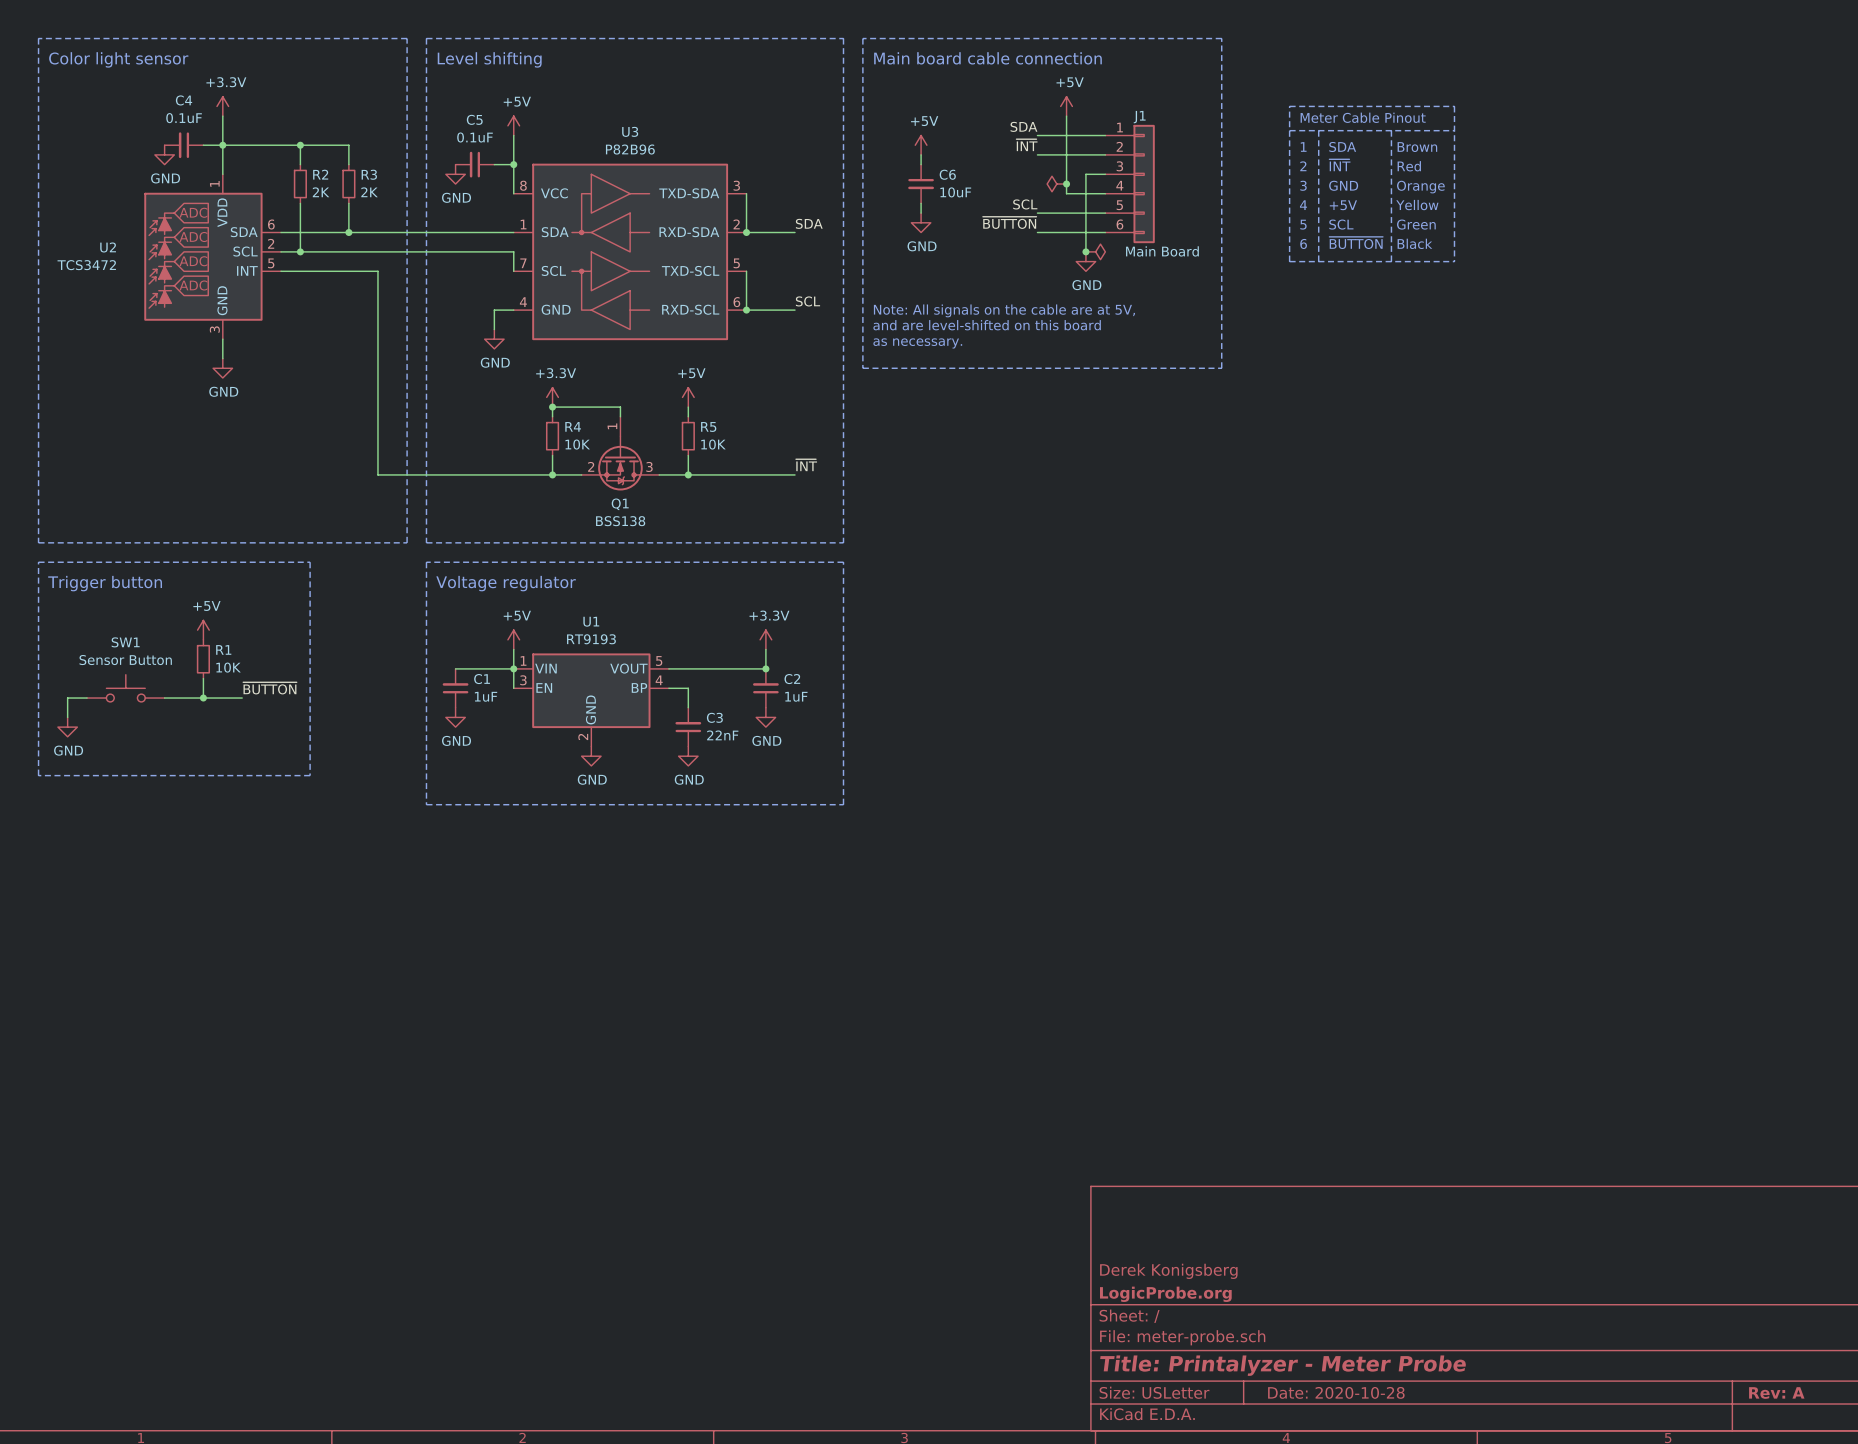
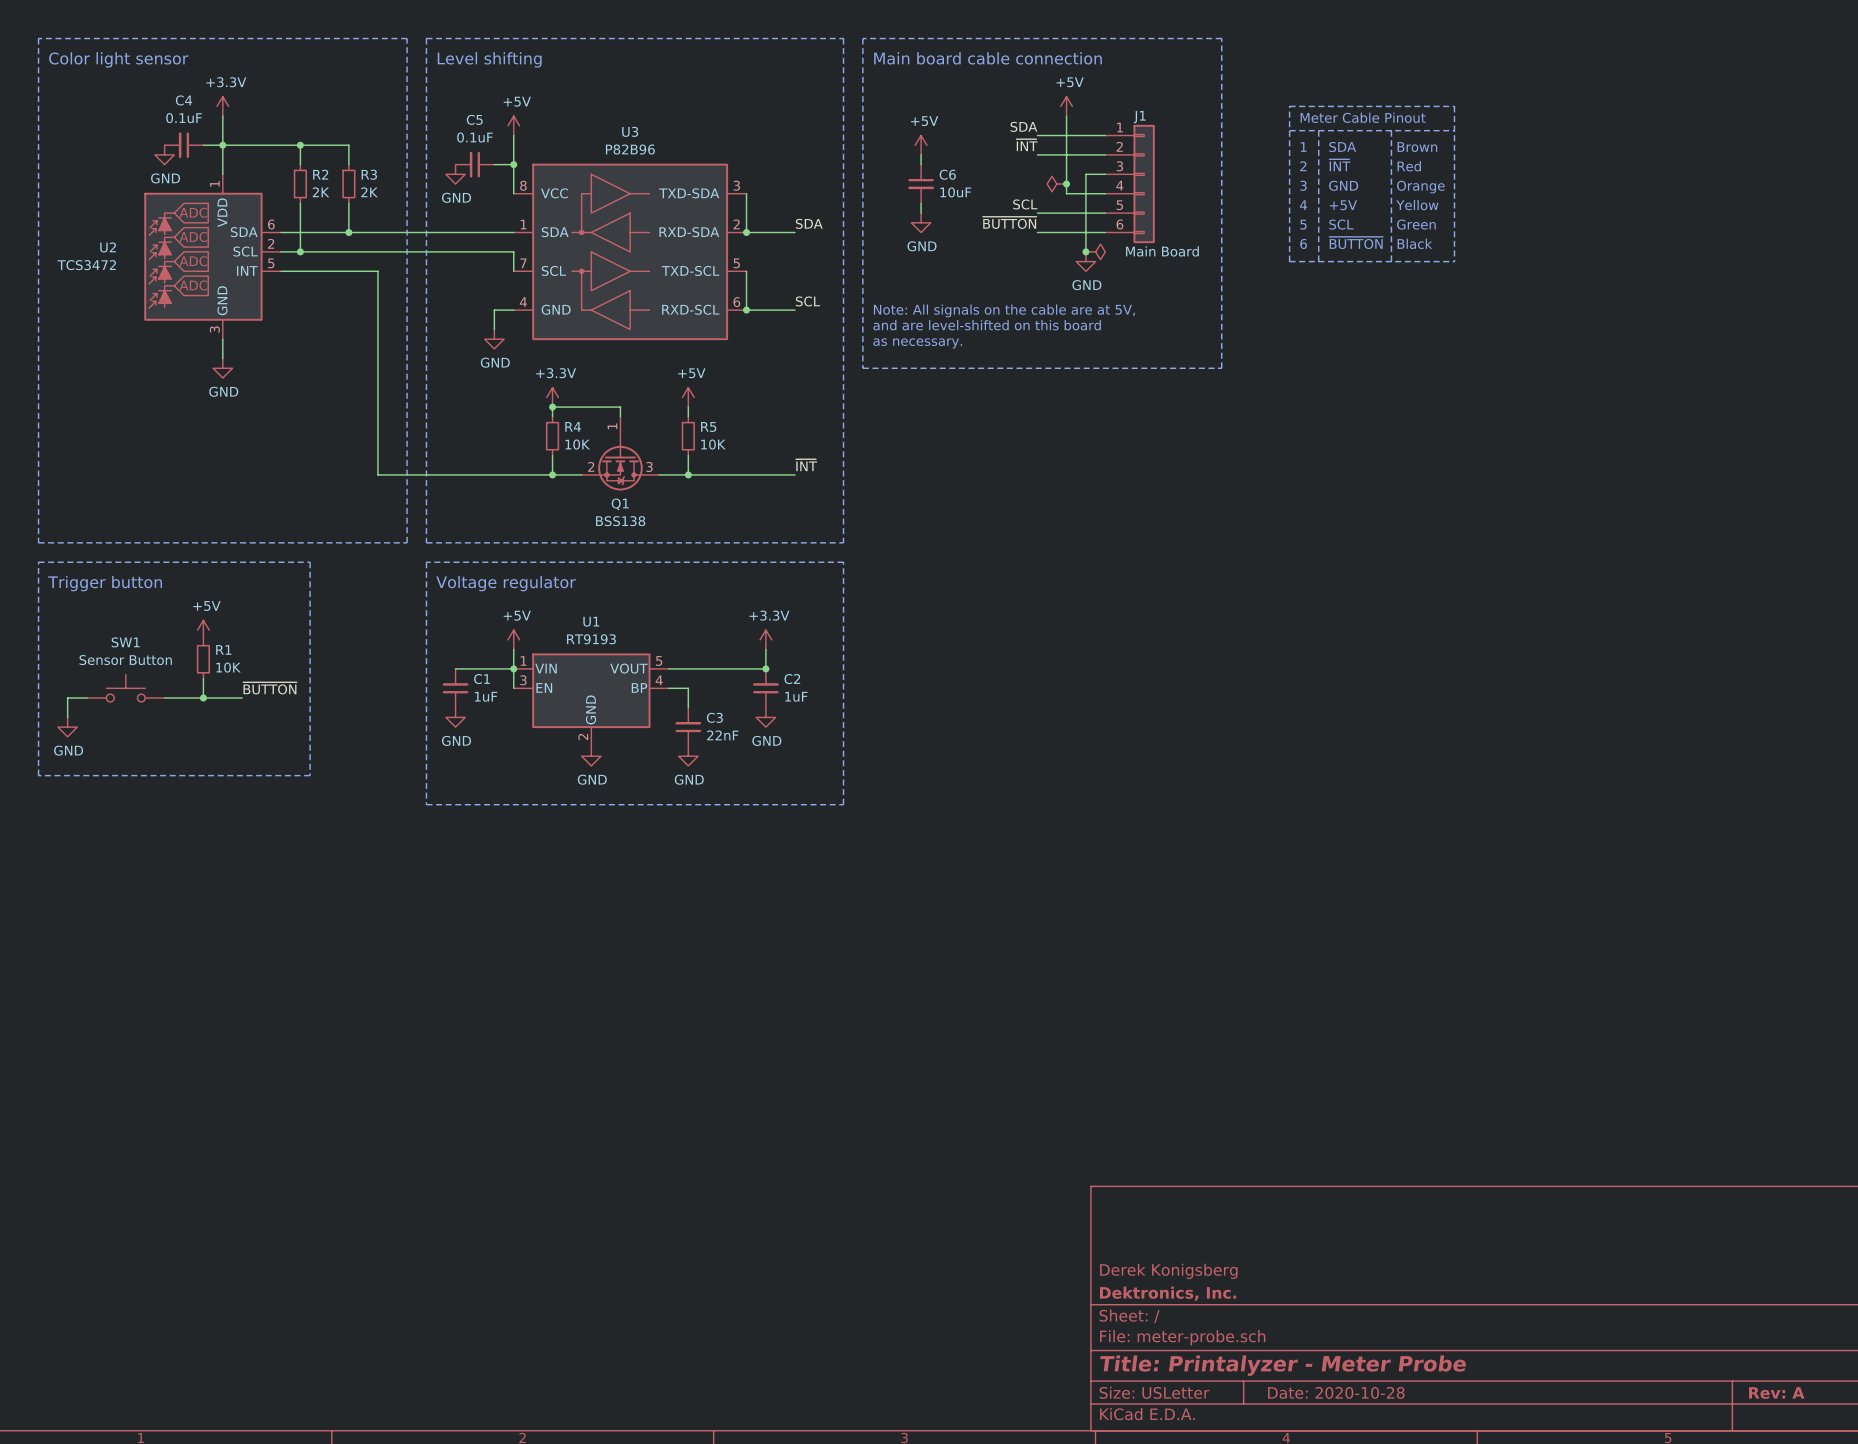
title block: LogicProbe.org (1165, 1294) -> Dektronics, Inc. (1168, 1293)

